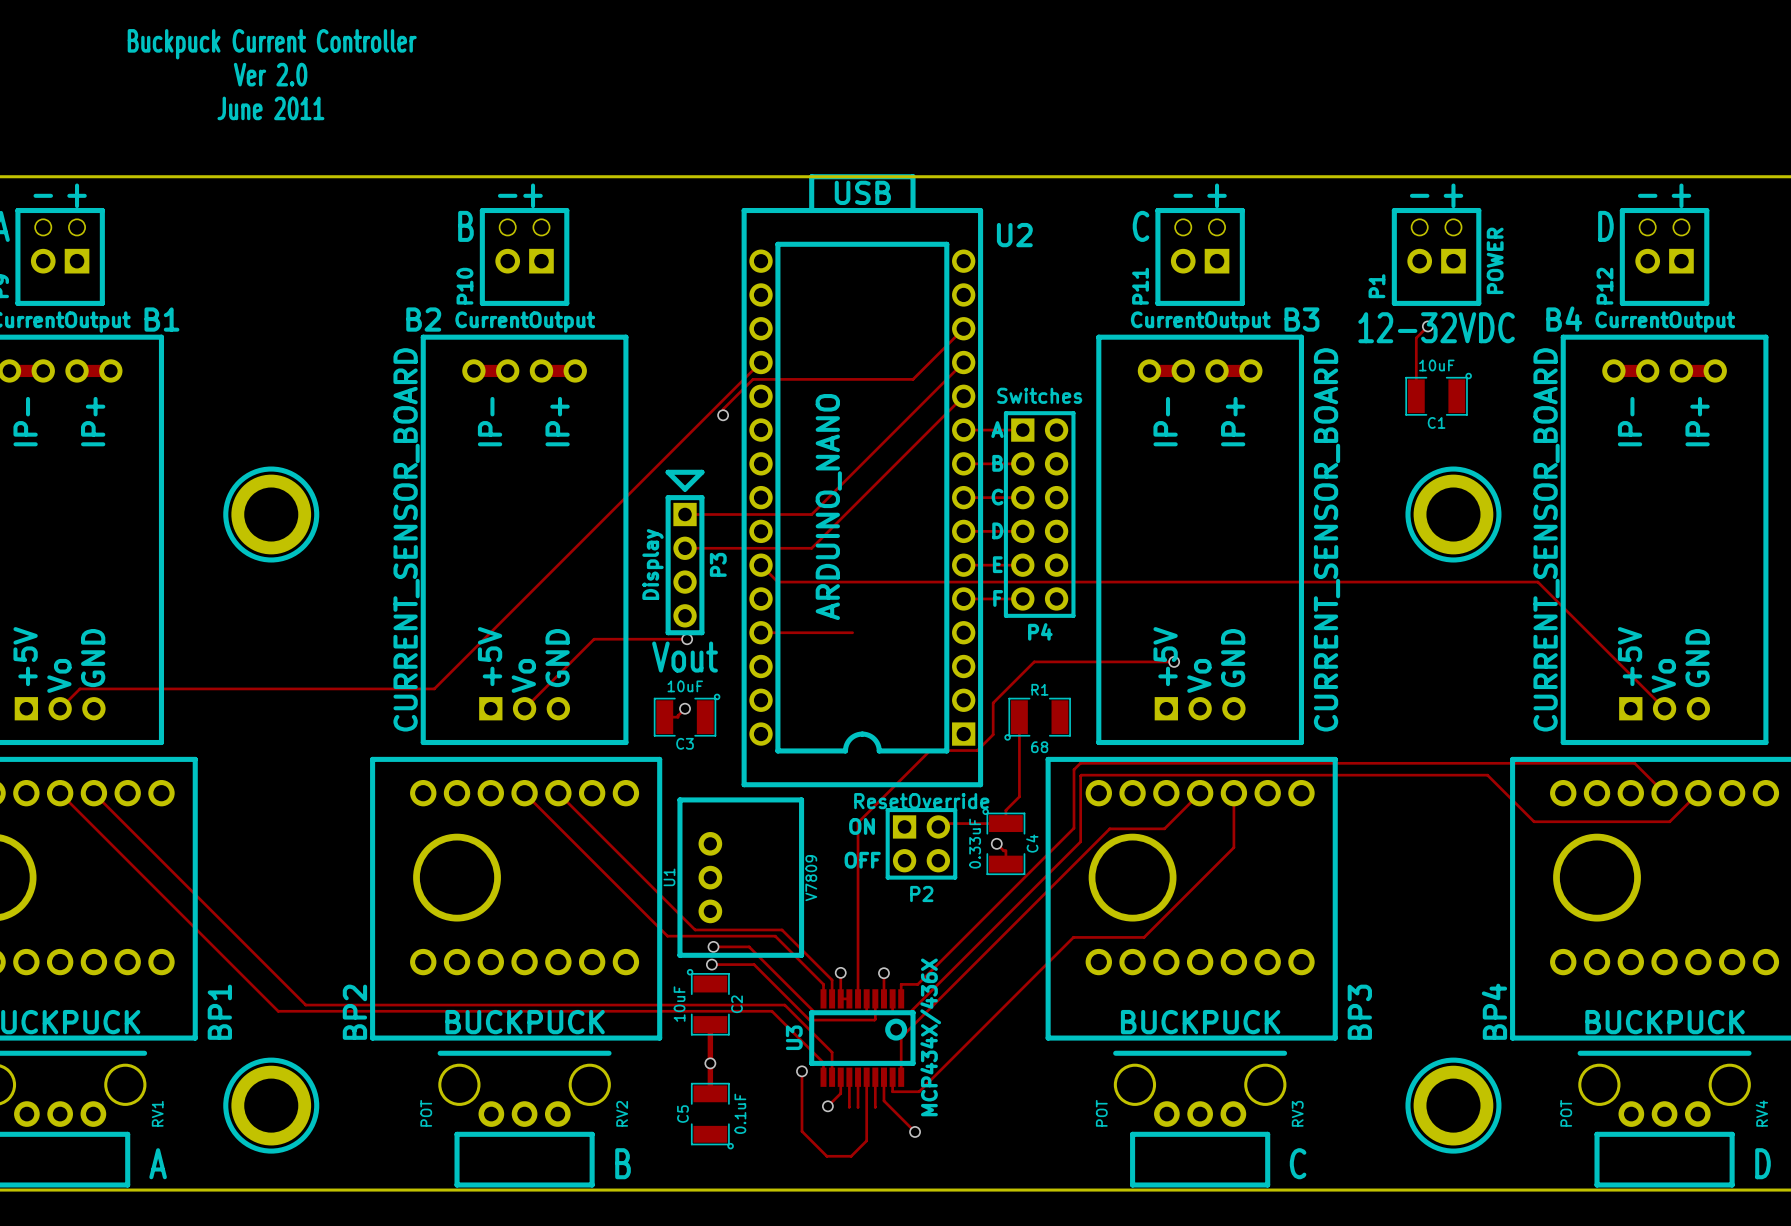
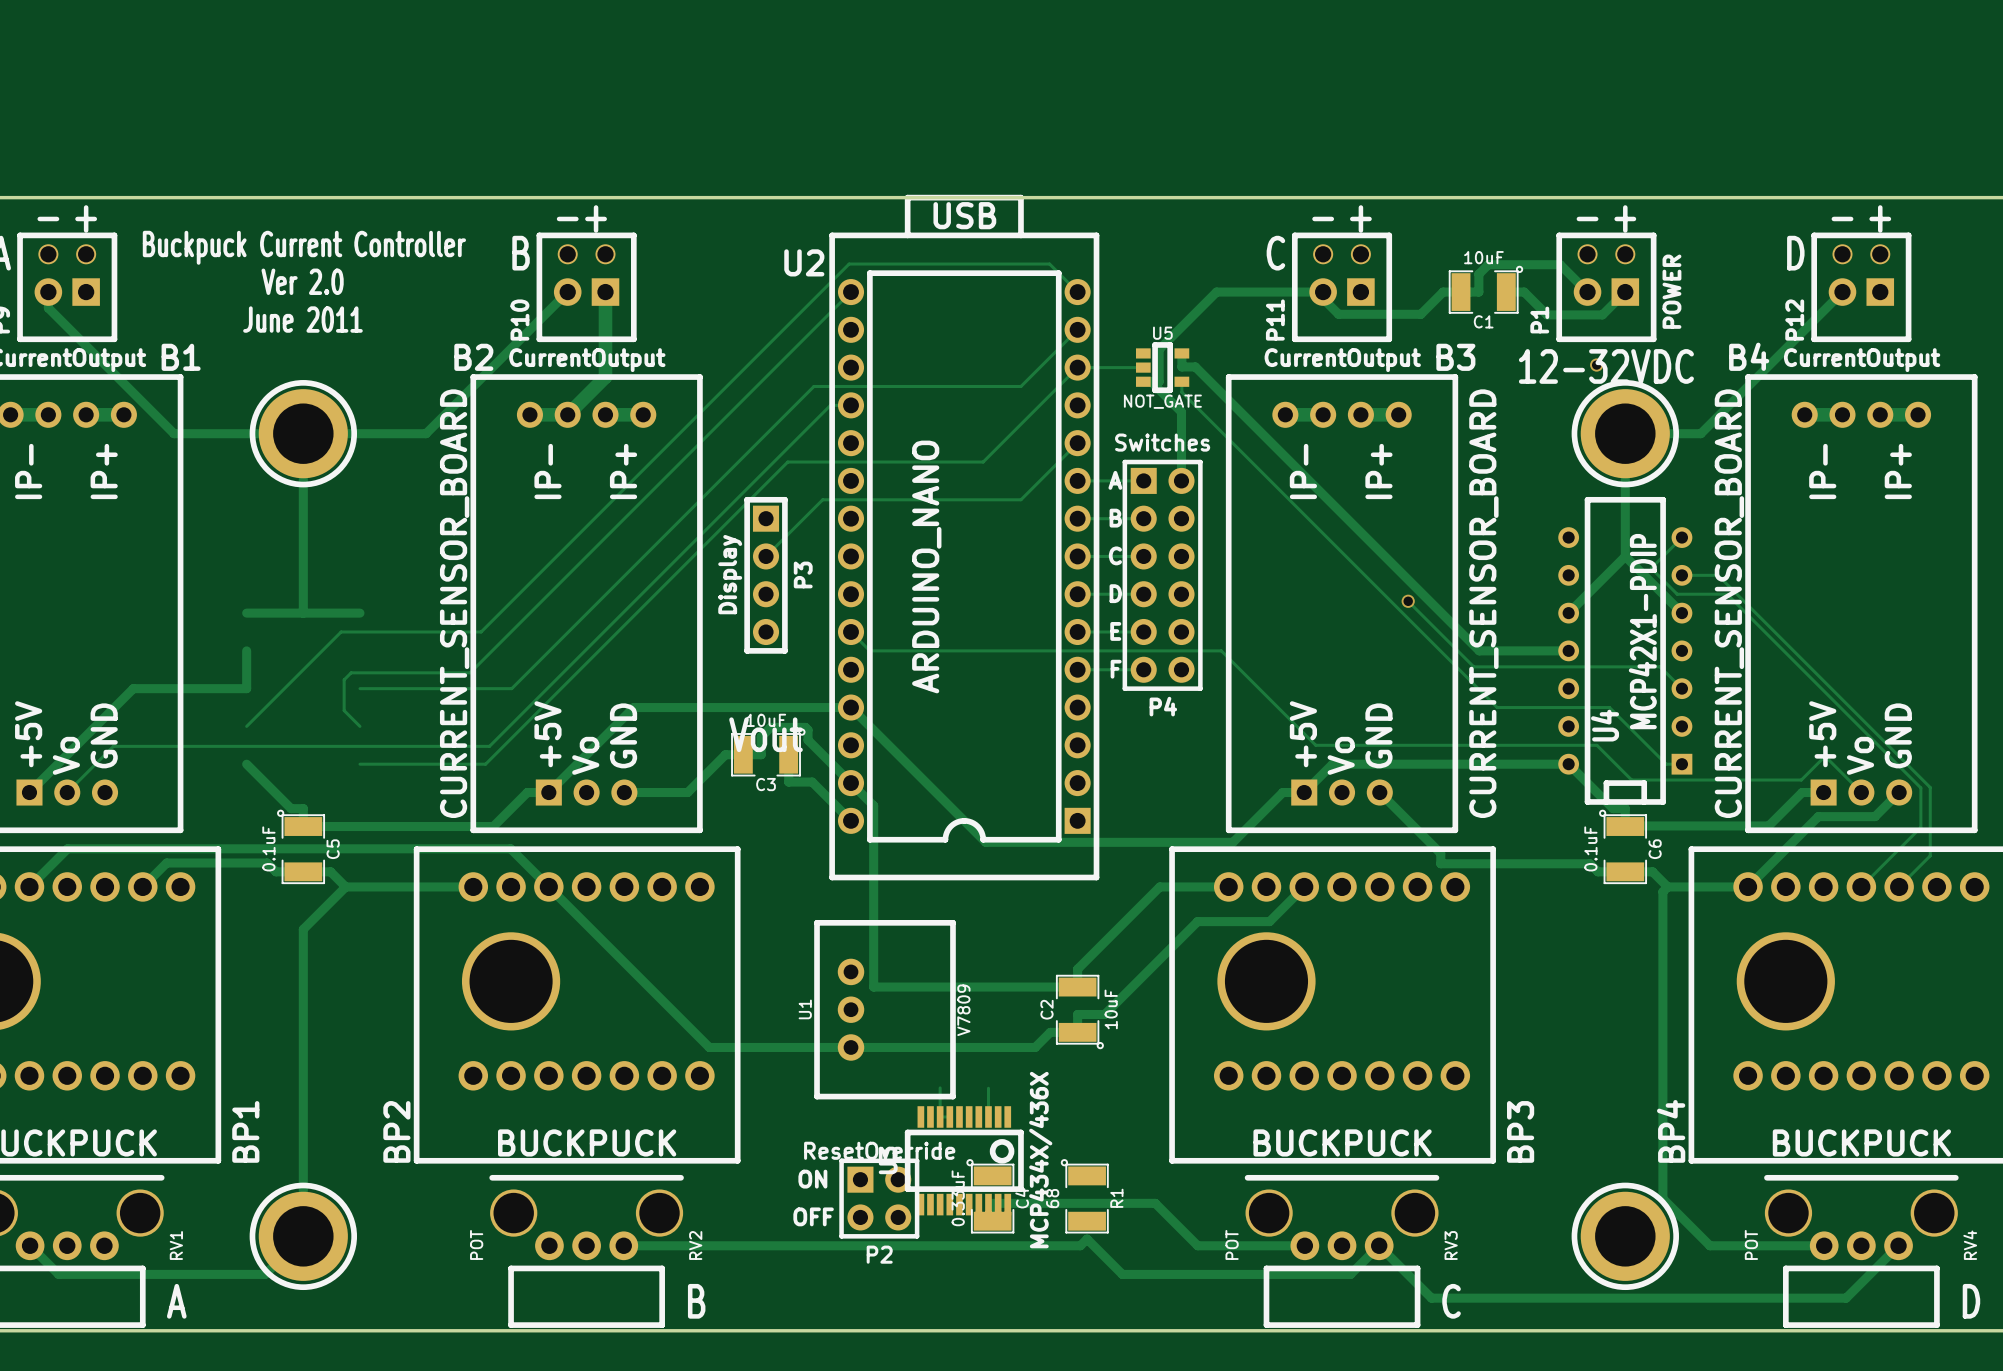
text position: Buckpuck Current Controller (272, 44) -> Buckpuck Current Controller (304, 247)
text position: Ver 2.0 (270, 74) -> Ver 2.0 (302, 281)
text position: June 2011 (270, 108) -> June 2011 (302, 319)
U2 name position: U2 (1014, 235) -> U2 (804, 262)
track: none -> (48, 292) (48, 308) (174, 433) (426, 433) (567, 292)
track: none -> (605, 292) (605, 377) (567, 414)
track: none -> (851, 292) (470, 672) (351, 672) (344, 679) (344, 710) (359, 726)
track: none -> (1077, 292) (1049, 264) (849, 264) (481, 632) (341, 632) (246, 726)
track: none -> (1506, 292) (1524, 292) (1547, 314) (1602, 314) (1625, 292)
track: none -> (1587, 292) (1560, 264) (1488, 264) (1478, 274) (1478, 292) (1443, 292) (1420, 314) (1338, 314) (1323, 298) (1323, 292) (1216, 292) (1159, 349) (1159, 381) (1143, 381)
track: none -> (1842, 292) (1700, 433) (1625, 433) (1625, 556)
track: none -> (1077, 329) (1020, 386) (813, 386) (511, 688) (359, 688)
track: (1427, 326) (1416, 337) (1416, 396) -> none
track: none -> (1077, 367) (1143, 367)
U5: none -> NOT_GATE (1162, 367)
track: none -> (1151, 381) (1181, 412) (1181, 480)
track: none -> (1181, 381) (1181, 392) (1497, 707) (1609, 707) (1666, 764) (1681, 764)
track: (760, 362) (434, 688) (79, 688) -> (850, 405) (830, 405) (489, 746) (113, 746) (89, 770)
track: (963, 362) (811, 514) (685, 514) -> none
track: (913, 379) (752, 379) (723, 409) (723, 415) -> (1020, 424) (983, 462) (787, 462) (485, 764) (359, 764)
track: none -> (303, 433) (303, 613)
C1 position: (1438, 394) -> (1485, 289)
via: (723, 415) -> none
track: (913, 446) (811, 548) (685, 548) -> (1020, 499) (822, 499) (766, 556)
line: (668, 472) (701, 472) (685, 489) (668, 472) -> none
track: none -> (1625, 556) (1681, 613)
track: none -> (1625, 556) (1568, 613)
part position: (271, 514) -> (303, 433)
part position: (1453, 514) -> (1625, 433)
track: none -> (1408, 601) (1473, 666) (1660, 666) (1681, 688)
via: none -> (1408, 601)
track: none -> (246, 613) (359, 613)
P3 position: (685, 565) -> (766, 575)
track: none -> (246, 650) (246, 688) (133, 688) (29, 792)
track: (1092, 582) (1322, 582) -> (1181, 353) (1181, 366) (1195, 366) (1479, 650)
track width: thin (1322, 582) (1402, 582) -> thick (1479, 650) (1568, 650)
track: (1402, 582) (1537, 582) (1632, 676) -> (1221, 650) (1315, 745) (1596, 745) (1631, 780) (1801, 780) (1825, 756)
U4: none -> MCP42X1-PDIP (1625, 650)
track: (761, 632) (852, 632) -> none
track: (687, 639) (594, 639) (524, 708) -> none
via: (687, 639) -> none
track: (1174, 661) (1034, 661) (993, 702) (993, 734) (977, 750) (930, 750) (858, 822) (858, 998) -> none
via: (1174, 661) -> none
track: none -> (788, 754) (788, 782) (812, 782) (851, 820)
track: none -> (246, 764) (291, 808) (303, 808) (303, 826) (493, 826) (527, 792) (548, 792) (633, 707) (851, 707) (985, 842) (1232, 842) (1282, 792) (1304, 792) (1332, 764) (1568, 764) (1613, 808) (1625, 808) (1625, 826)
track: none -> (624, 792) (687, 792) (725, 754) (761, 754) (761, 736) (770, 727) (805, 727) (808, 730) (808, 740) (873, 805) (873, 987) (1077, 987) (1077, 969) (1159, 886) (1228, 886)
track: (685, 708) (678, 717) (664, 717) -> none
via: (685, 708) -> none
track: none -> (1379, 792) (1440, 853) (1440, 863) (1589, 863) (1598, 871) (1652, 871) (1667, 886)
track: none -> (1823, 792) (1802, 792) (1768, 825) (1625, 825)
track: none -> (1899, 792) (1875, 816) (1818, 816) (1748, 886) (1667, 886)
C3 position: (687, 715) -> (768, 752)
track: (1019, 717) (1019, 796) (1005, 810) (1005, 823) (941, 823) (938, 826) -> none
R1 rotation: 0° (1037, 719) -> 90° clockwise (1084, 1196)
R1 position: (1037, 719) -> (1084, 1196)
C6: none -> 0.1uF (1623, 846)
track: none -> (29, 886) (67, 848) (510, 848) (709, 1047) (1035, 1047) (1050, 1032) (1077, 1032) (1077, 1014) (1104, 1014) (1197, 921) (1269, 921) (1304, 886)
track: (60, 793) (278, 1011) (772, 1011) (823, 1062) (823, 1077) -> none
track: (93, 793) (305, 1005) (784, 1005) (832, 1052) (832, 1077) -> none
track: none -> (142, 886) (166, 863) (267, 863) (276, 871) (330, 871) (345, 886)
track: none -> (345, 886) (473, 886)
track: none -> (345, 886) (303, 929) (303, 1236) (265, 1274) (58, 1274) (30, 1245)
track: (524, 793) (667, 936) (775, 936) (823, 984) (823, 998) -> none
track: (558, 793) (695, 929) (782, 929) (832, 980) (832, 998) -> none
track: (1200, 793) (1164, 828) (1109, 828) (901, 1037) (901, 1077) -> none
track: (1233, 793) (1233, 847) (1144, 937) (1073, 937) (919, 1091) (892, 1091) (892, 1077) -> none
track: none -> (1667, 886) (1662, 891) (1662, 1198) (1709, 1245) (1824, 1245)
track: (1664, 793) (1634, 763) (1080, 763) (1074, 769) (1074, 828) (917, 984) (901, 984) (901, 998) -> (1861, 886) (1920, 827) (1920, 787) (1727, 594) (1677, 594) (1651, 568) (1681, 537)
track: (1698, 793) (1669, 821) (1534, 821) (1487, 775) (1081, 775) (1080, 841) (909, 1013) (892, 1013) (892, 998) -> (1899, 886) (1930, 855) (1930, 787) (1718, 575) (1681, 575)
text position: ON (862, 826) -> ON (812, 1179)
C4 position: (1003, 841) -> (990, 1196)
P2 position: (921, 843) -> (879, 1198)
track: (996, 843) (1005, 850) (1005, 864) -> none
via: (996, 843) -> none
text position: OFF (862, 860) -> OFF (813, 1216)
U1 position: (740, 877) -> (884, 1009)
track: (713, 946) (749, 946) (815, 1013) (866, 1013) (866, 998) -> none
via: (713, 946) -> none
track: (711, 964) (754, 964) (809, 1020) (874, 1020) (875, 998) -> none
via: (711, 964) -> none
via: (840, 972) -> none
via: (883, 973) -> none
C2 rotation: 0° (708, 1002) -> 180° (1079, 1011)
C2 position: (708, 1002) -> (1079, 1011)
track: (710, 1024) (710, 1093) -> none
via: (710, 1063) -> none
track: (801, 1071) (801, 1131) (826, 1156) (851, 1156) (866, 1140) (866, 1077) -> none
via: (801, 1071) -> none
track: (840, 1077) (840, 1093) (827, 1106) -> none
track: (849, 1077) (849, 1107) -> none
track: (858, 1077) (858, 1107) -> none
track: (875, 1077) (875, 1107) -> none
track: (883, 1077) (883, 1100) (915, 1131) -> none
track: none -> (992, 1221) (992, 1203) (1155, 1203) (1197, 1245) (1304, 1245)
via: (827, 1106) -> none
track: none -> (623, 1245) (1080, 1245) (1087, 1239) (1122, 1274) (1350, 1274) (1379, 1245) (1431, 1298) (1846, 1298) (1898, 1245)
C5 rotation: 0° (712, 1116) -> 180° (301, 846)
C5 position: (712, 1116) -> (301, 846)
via: (915, 1131) -> none

